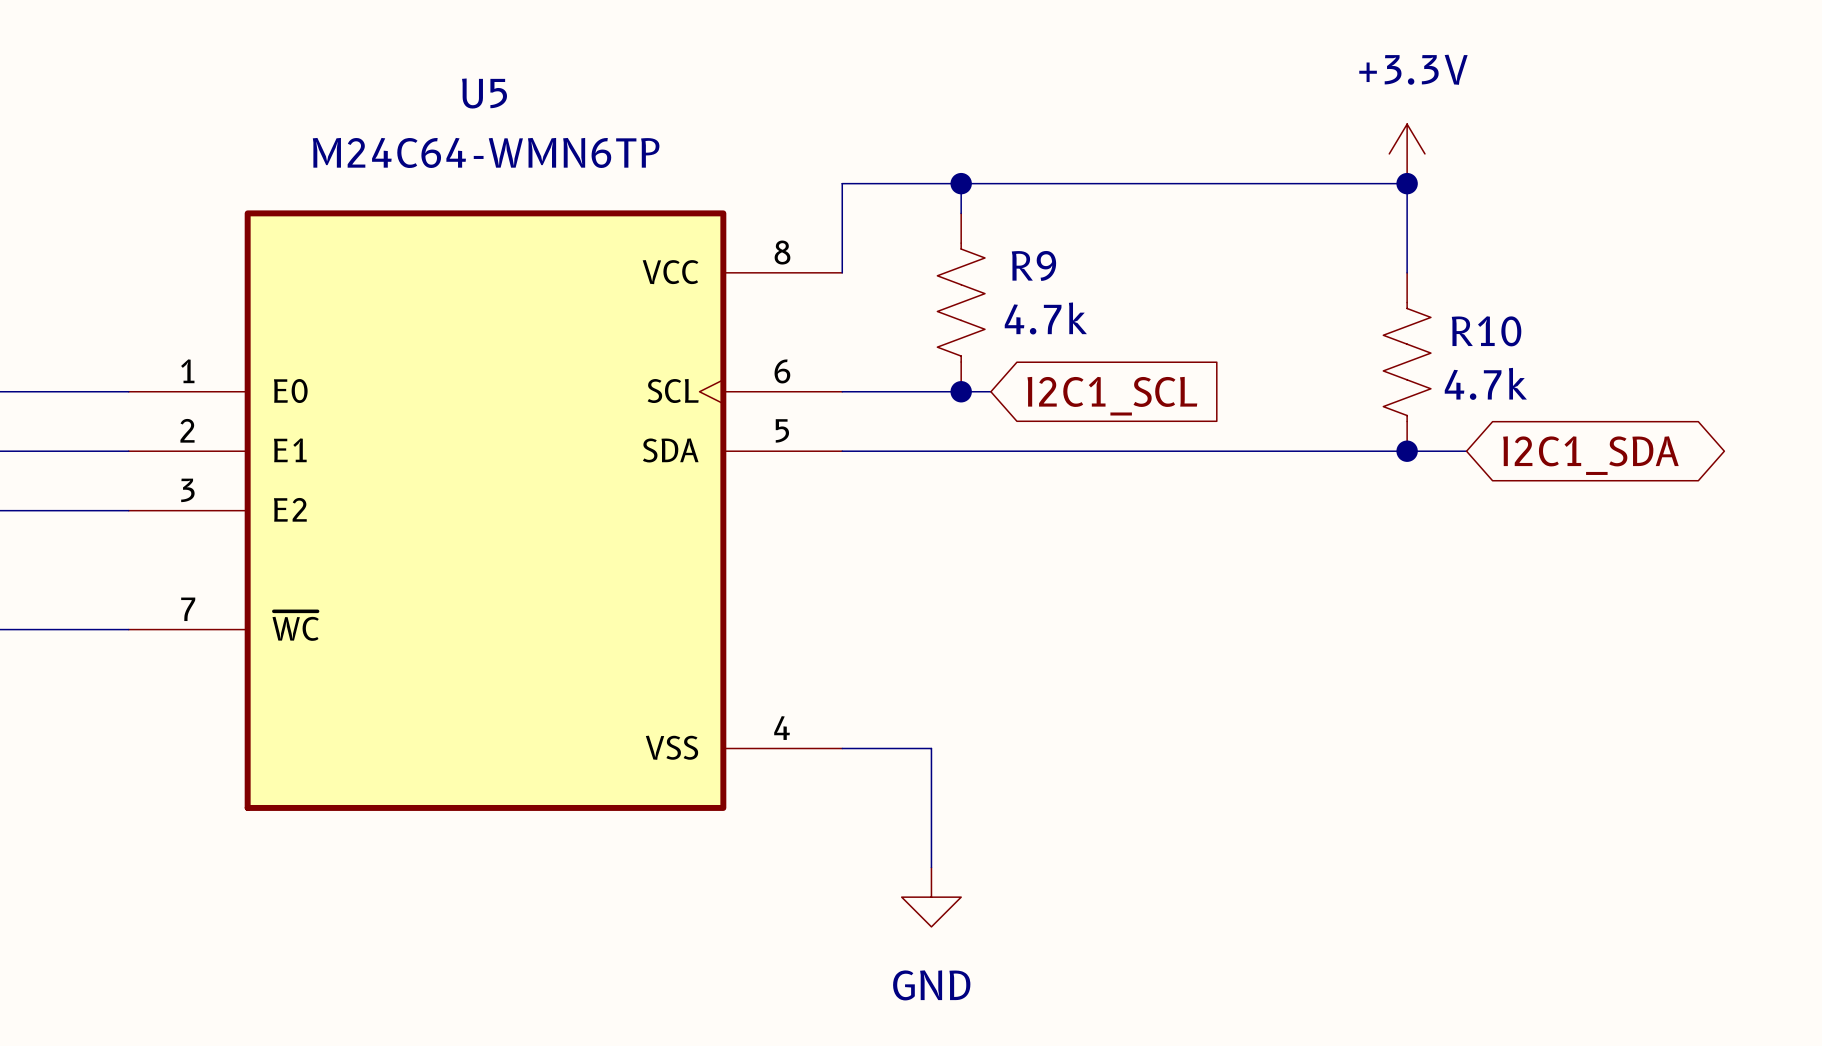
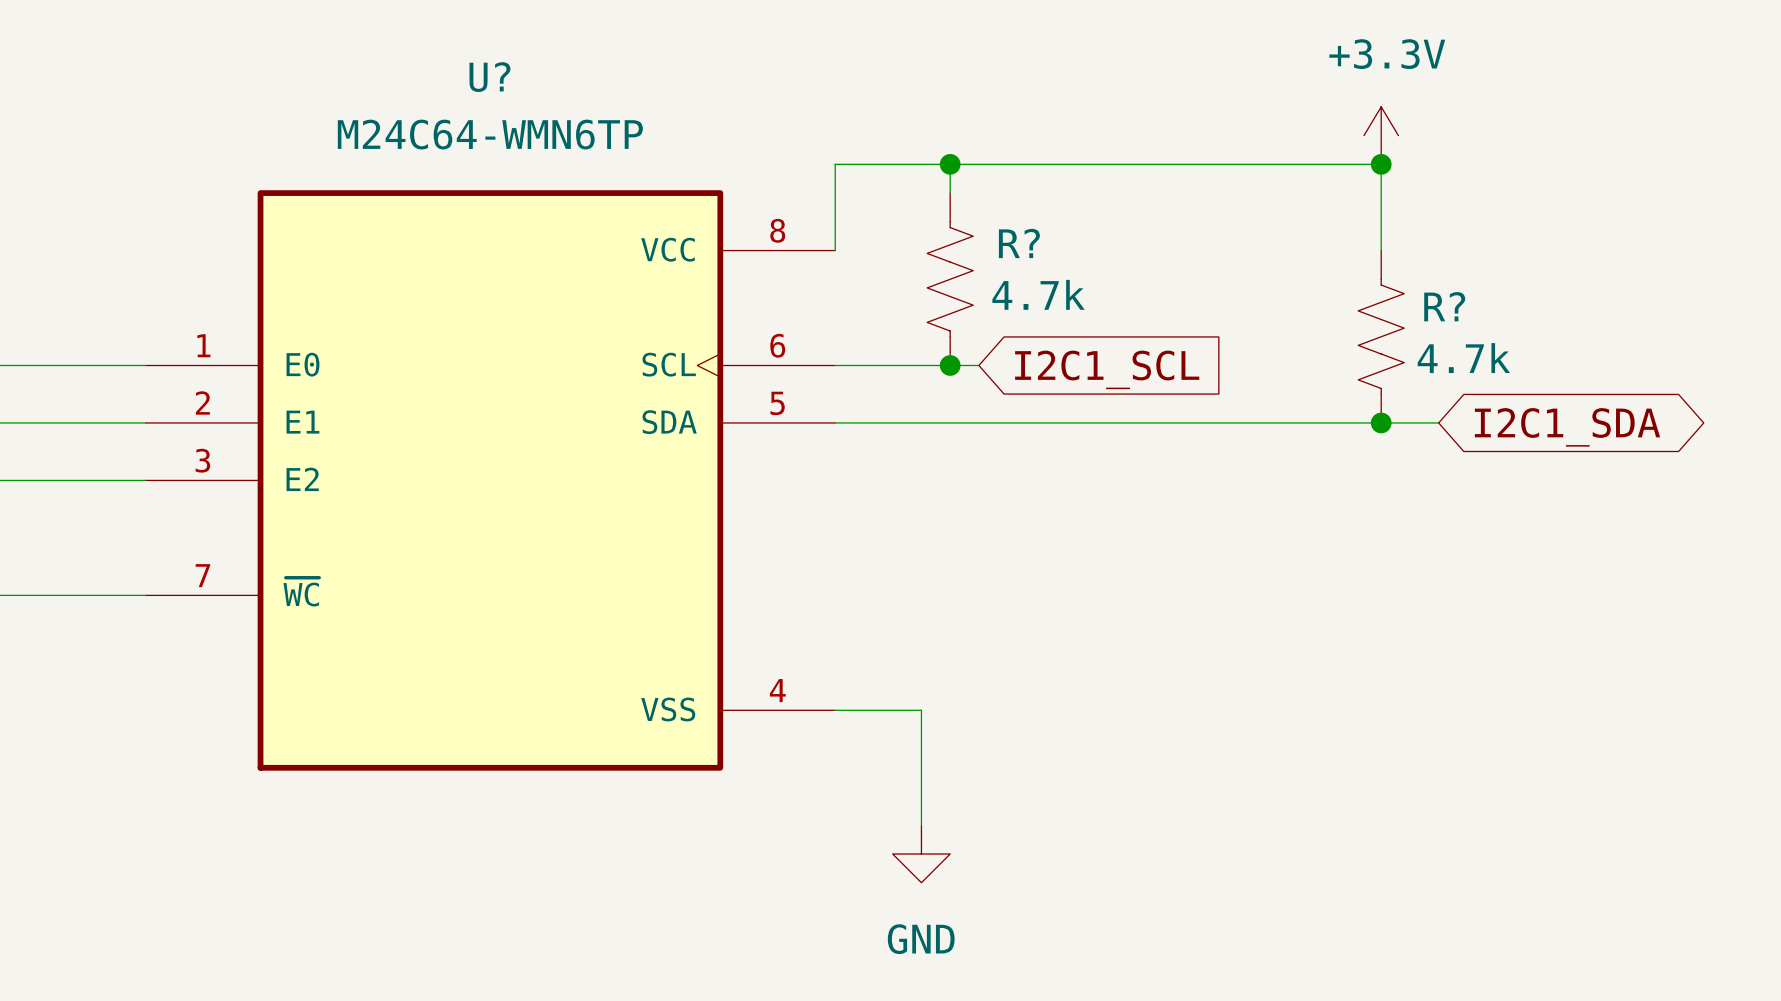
U5 name: U5 (484, 93) -> U? (489, 77)
R9 name: R9 (1033, 265) -> R? (1019, 243)
R10 name: R10 (1486, 331) -> R? (1444, 306)

